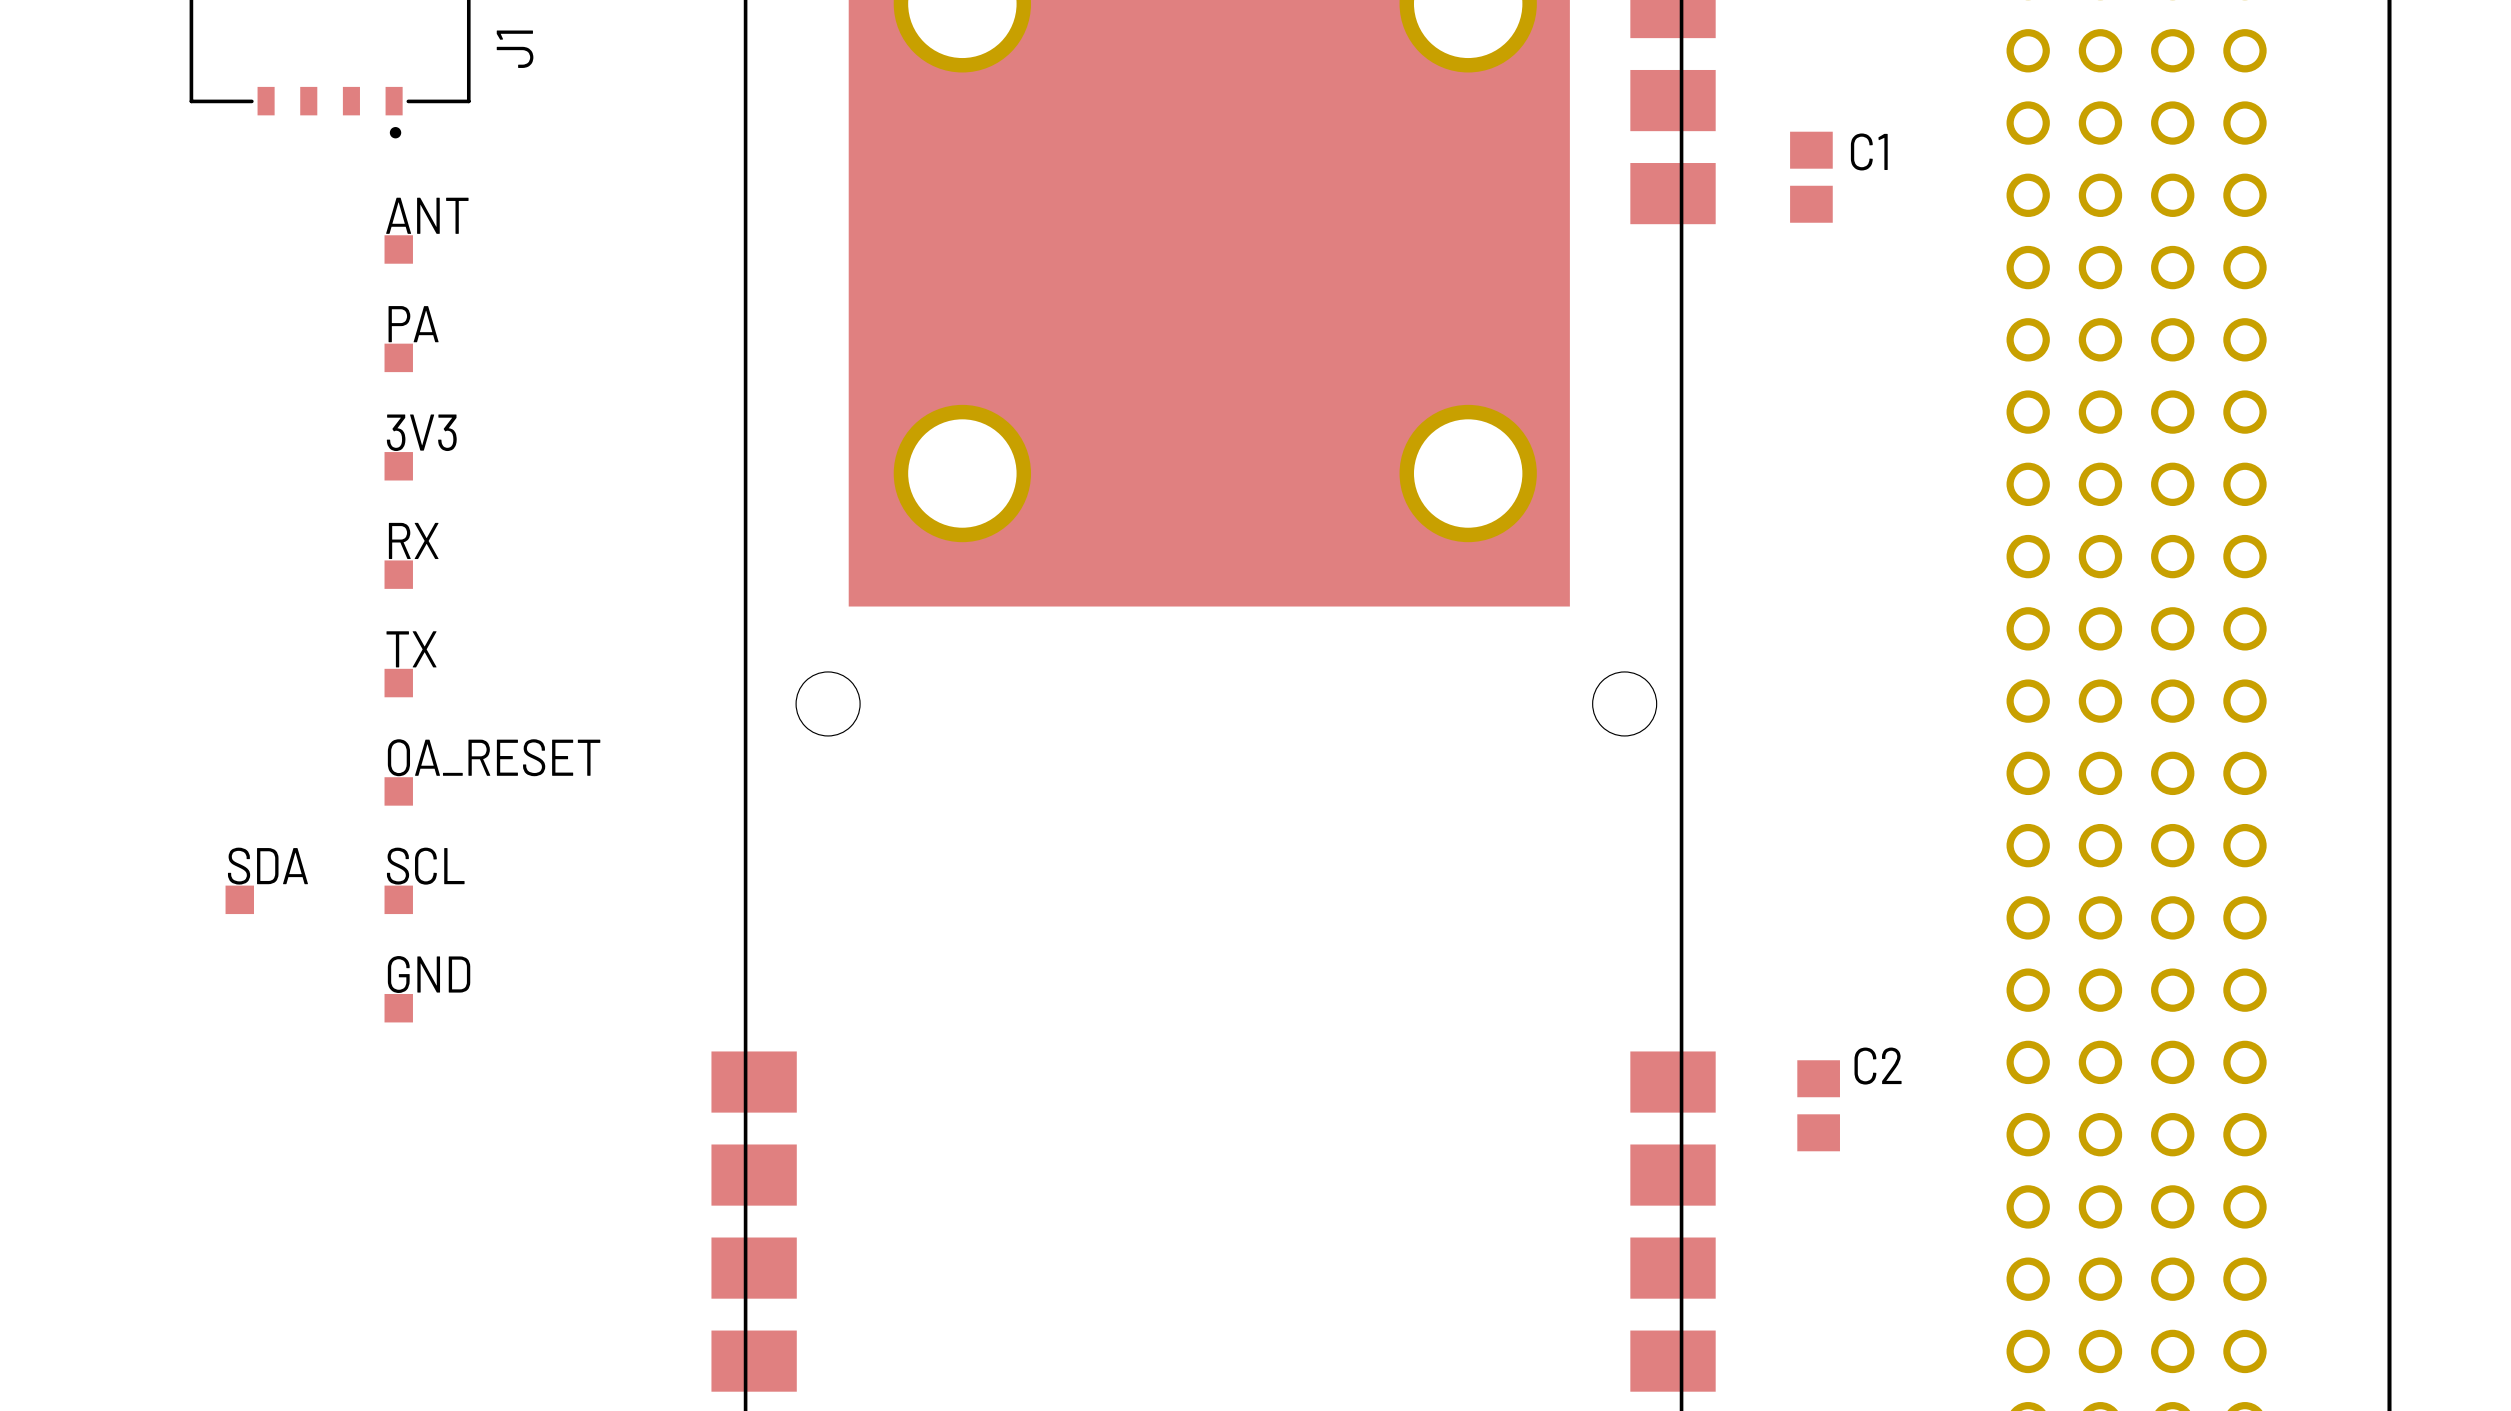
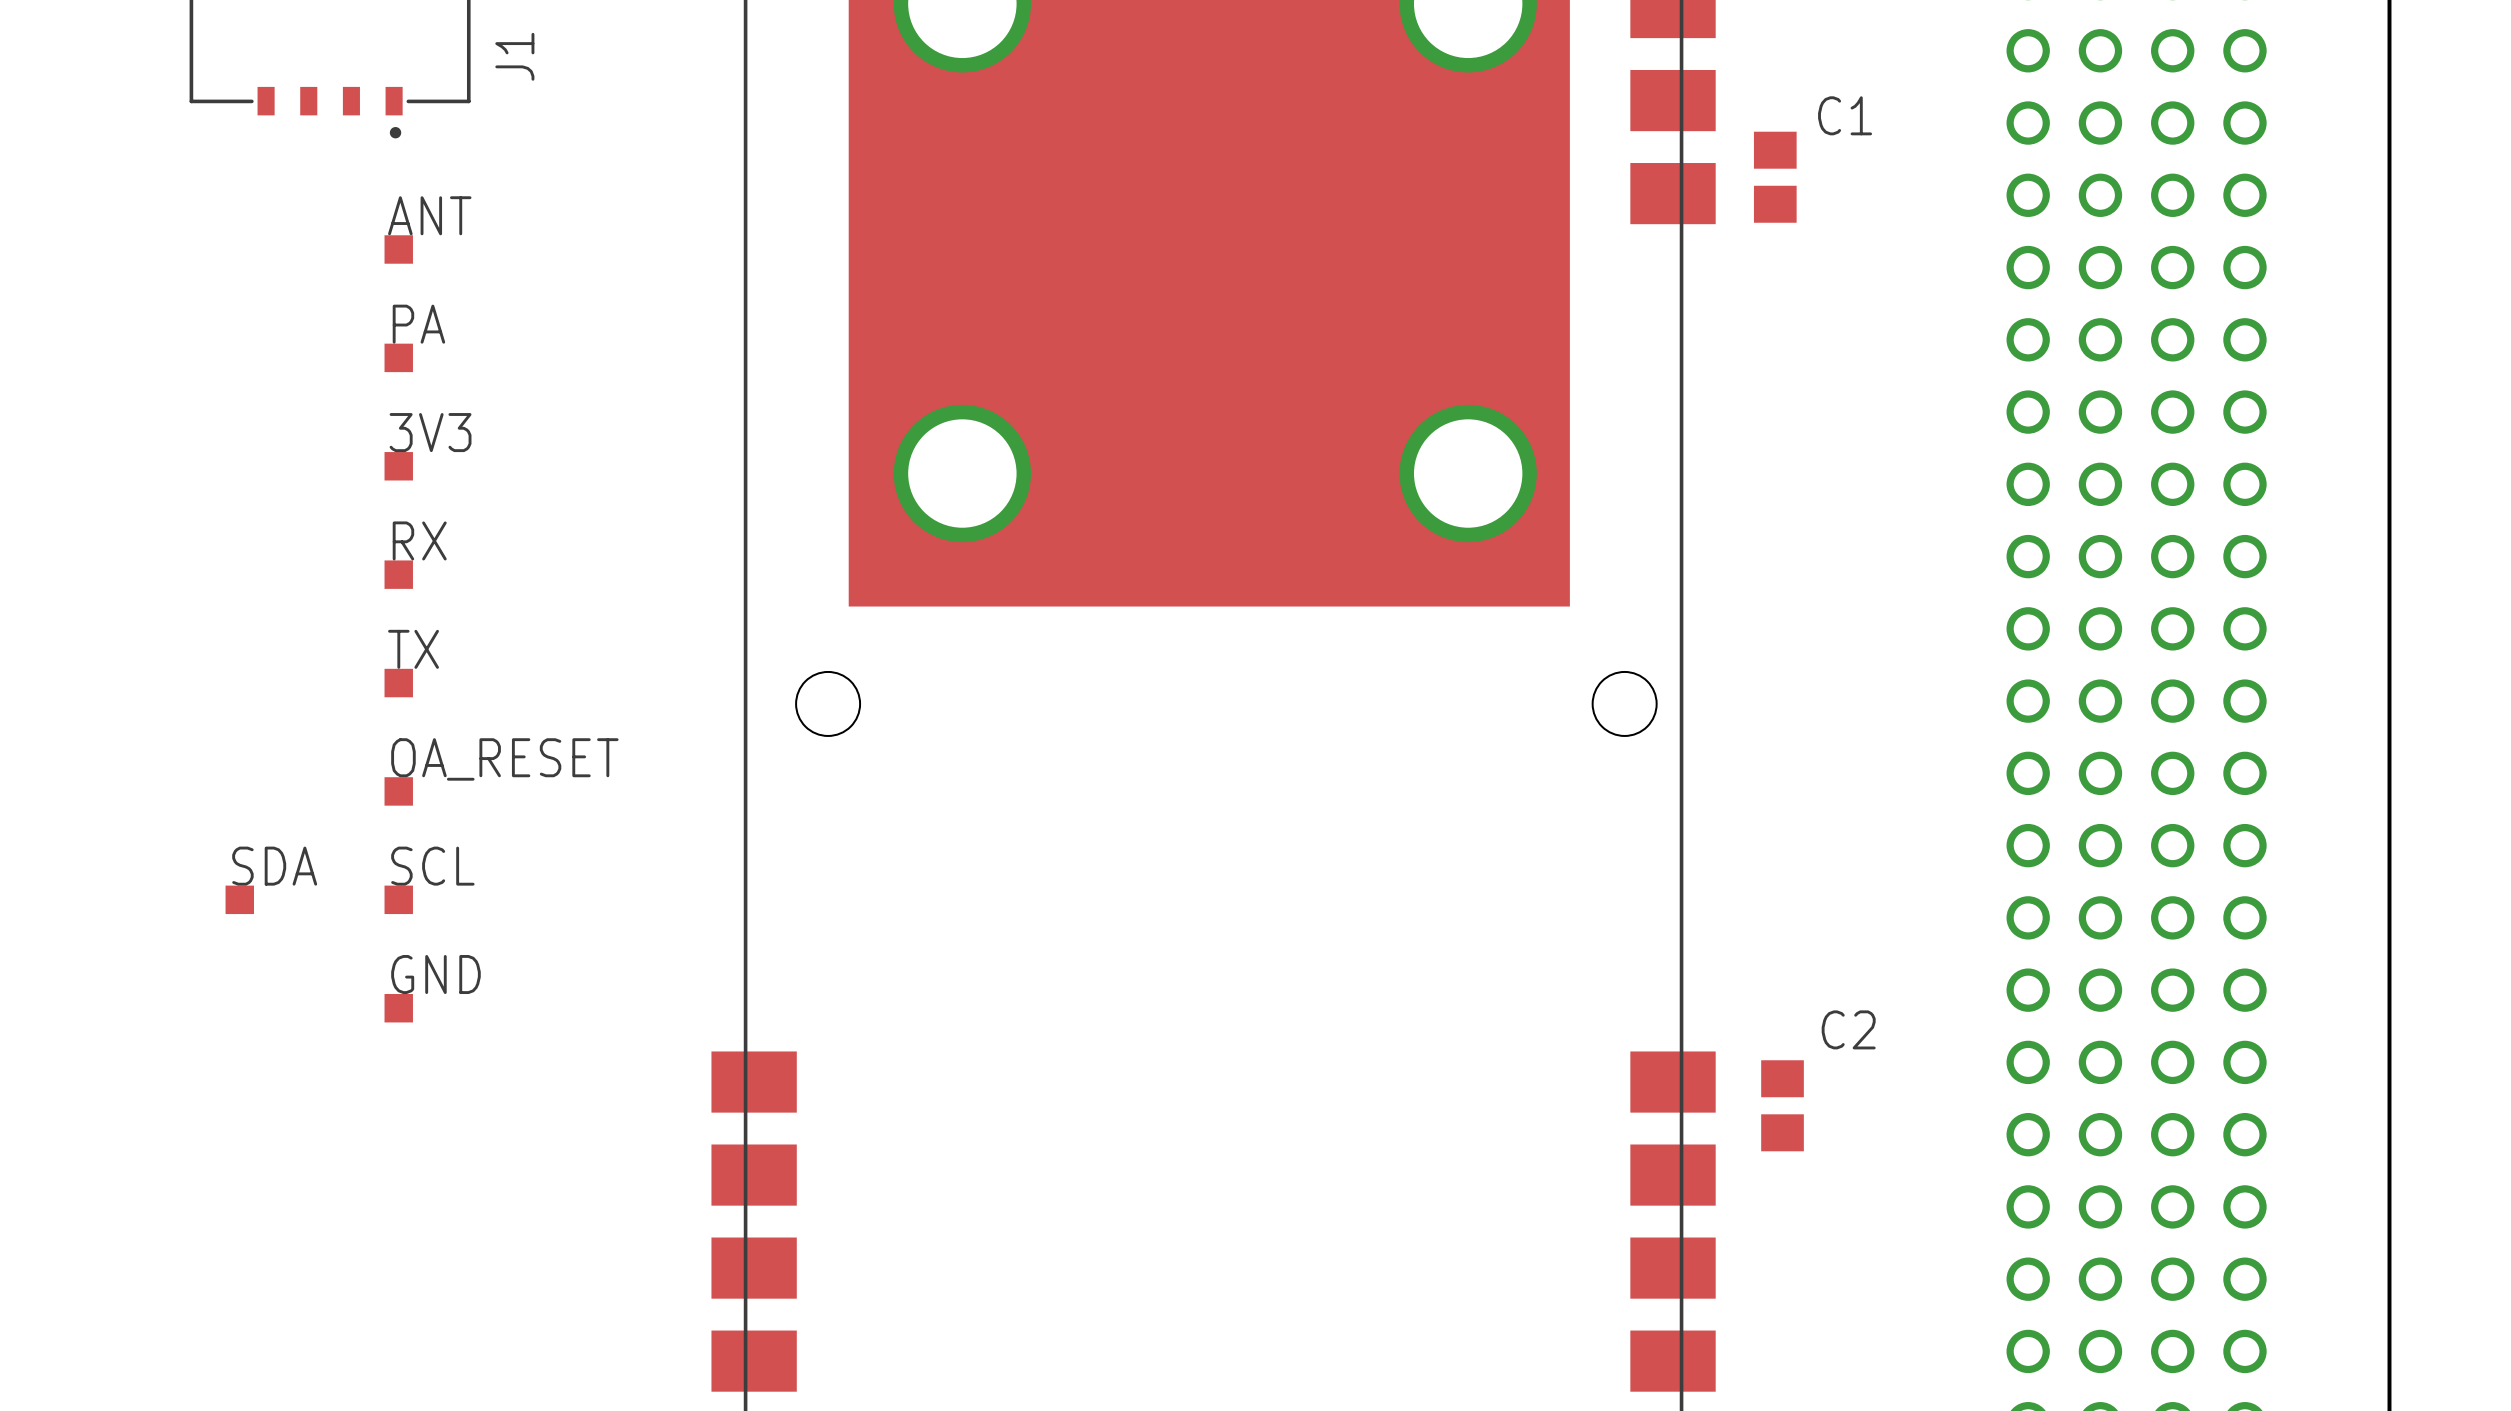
C1 name position: C1 (1869, 151) -> C1 (1845, 115)
C1 position: (1811, 177) -> (1775, 177)
C2 name position: C2 (1878, 1066) -> C2 (1848, 1029)
C2 position: (1818, 1105) -> (1782, 1105)

